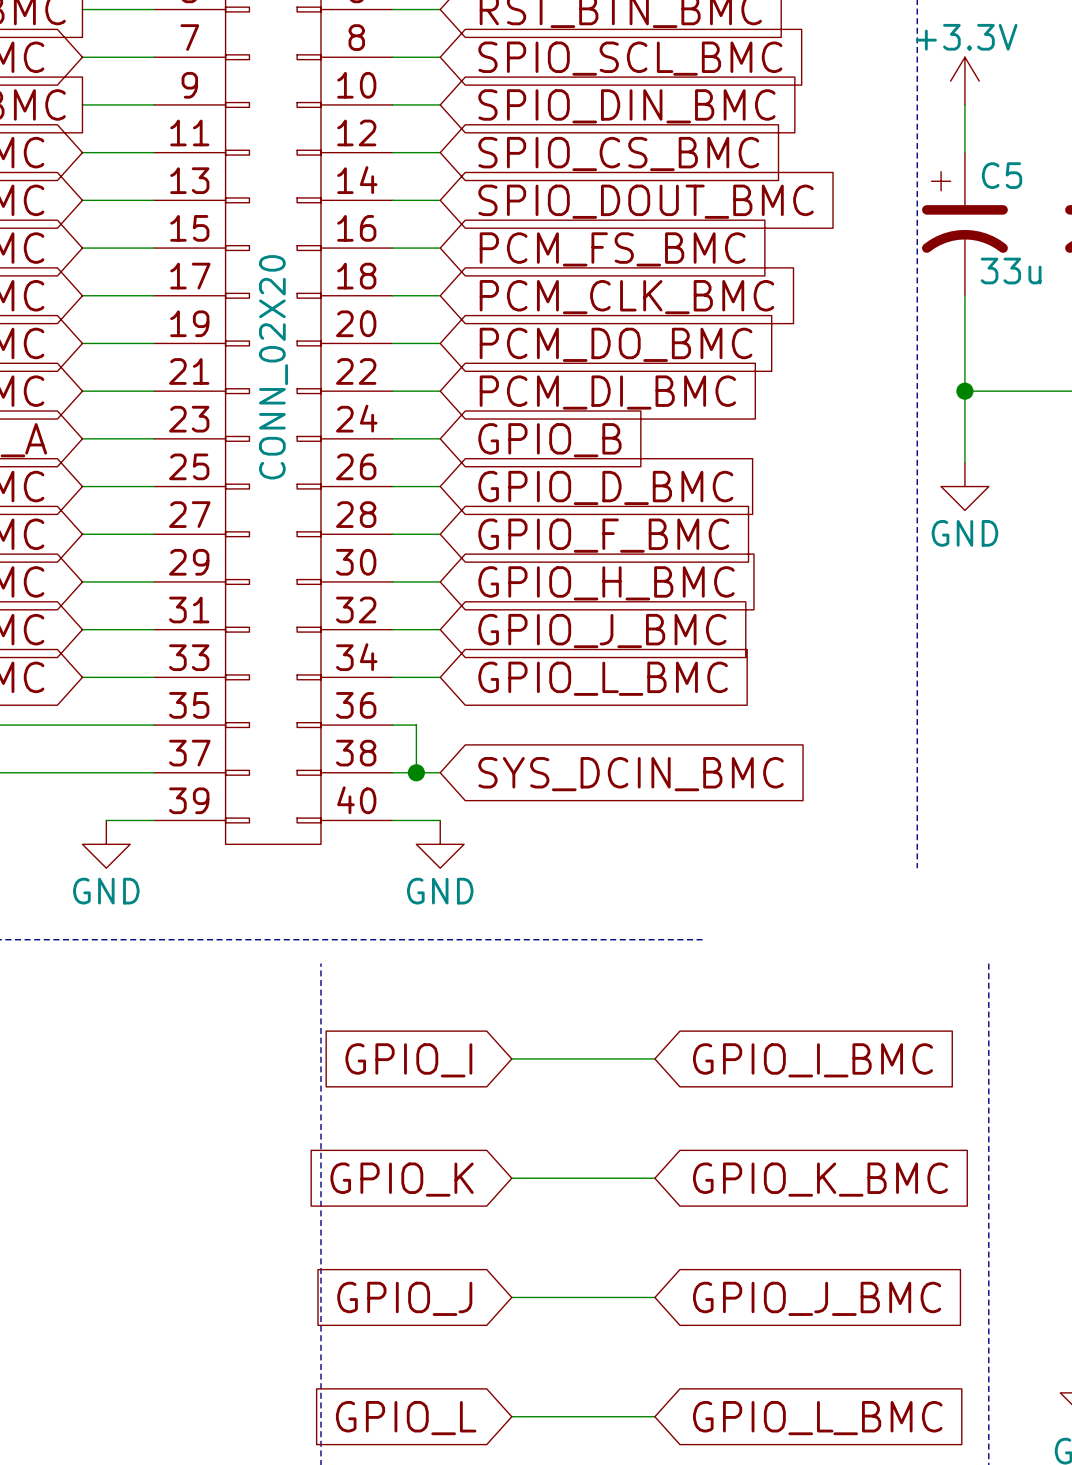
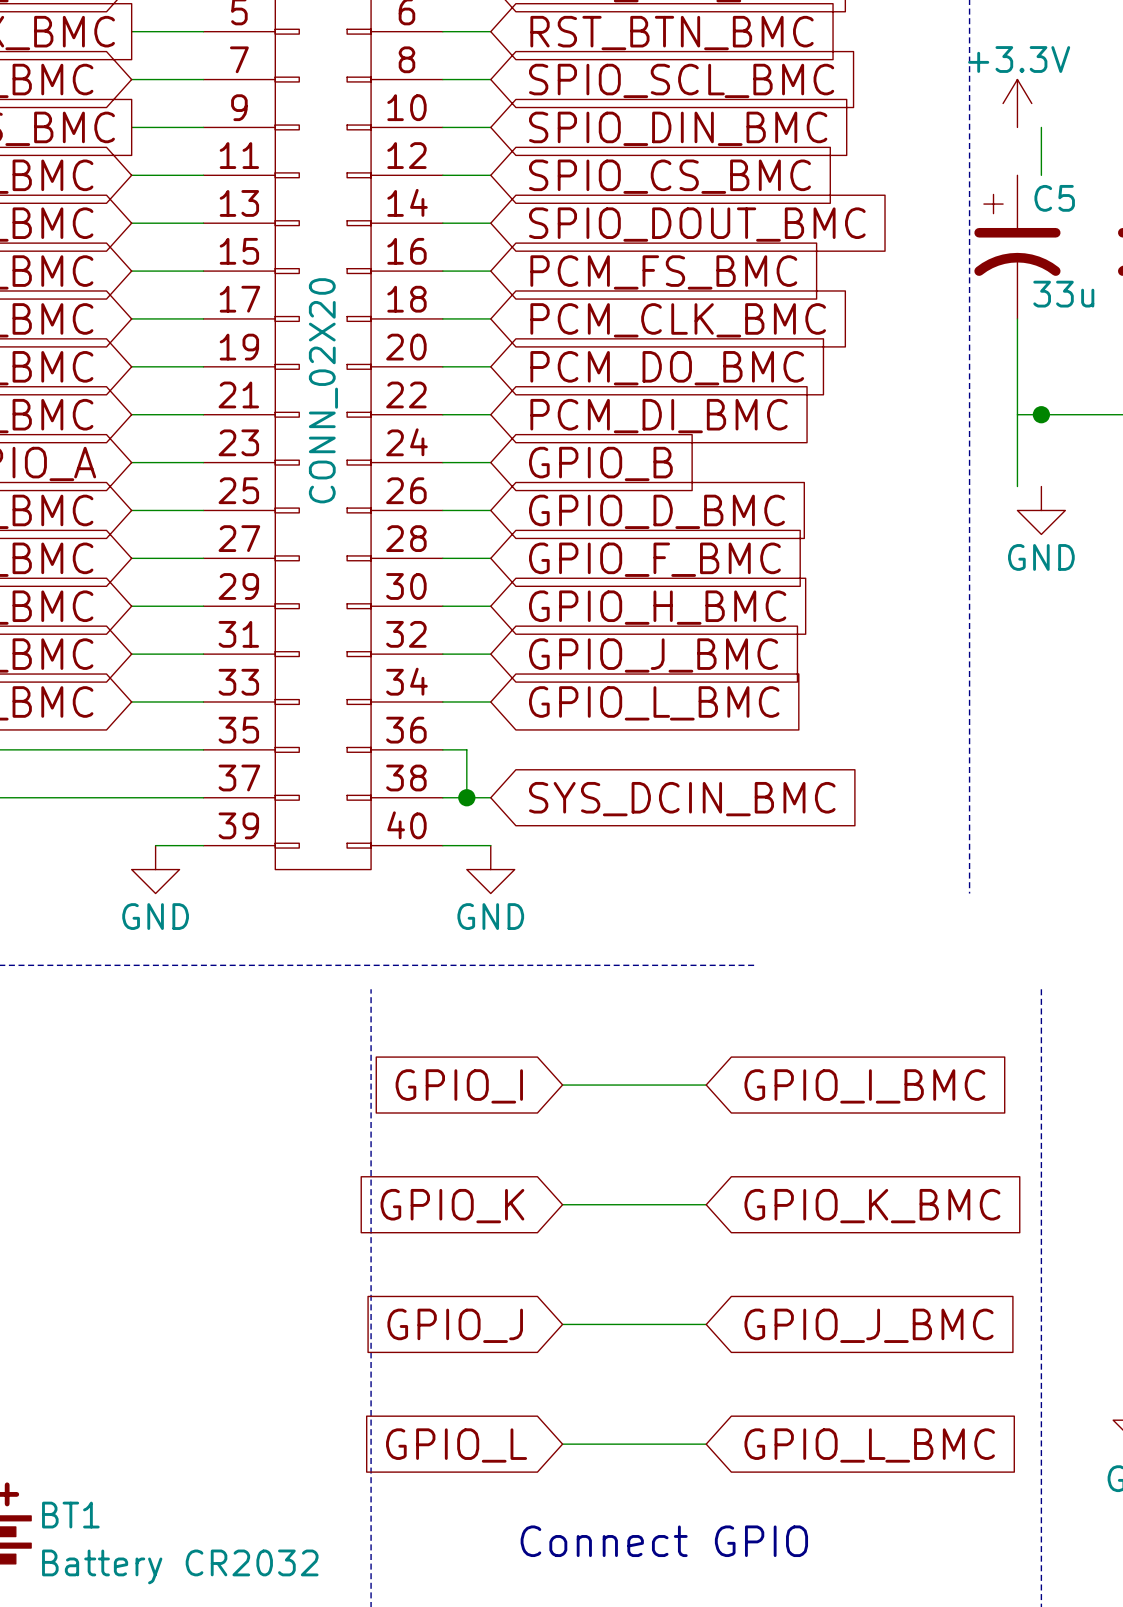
wire: (964, 104) (964, 152) -> (1041, 127) (1041, 175)
junction position: (964, 391) -> (1041, 414)
power symbol position: GND (964, 486) -> GND (1041, 510)

